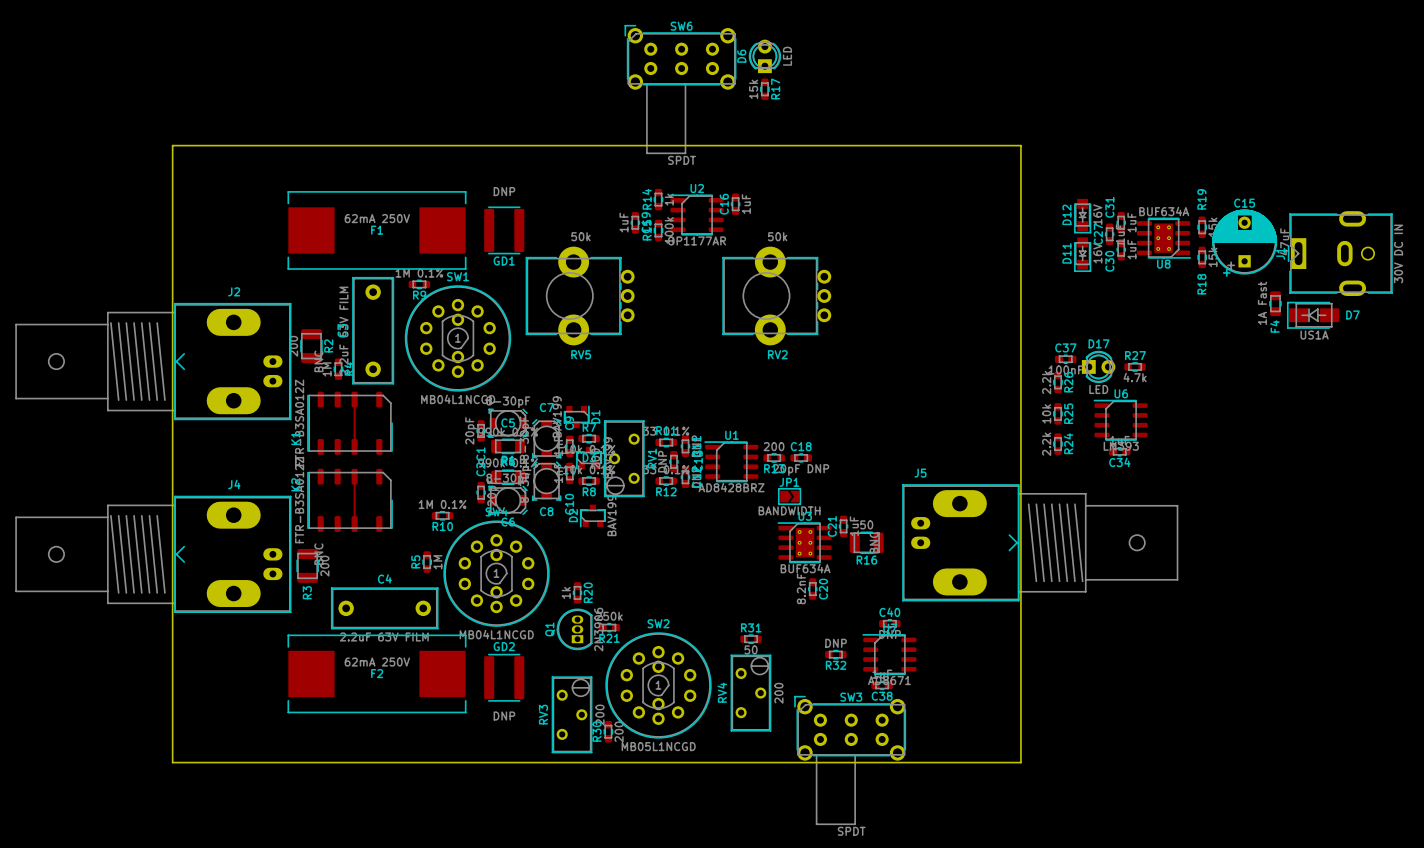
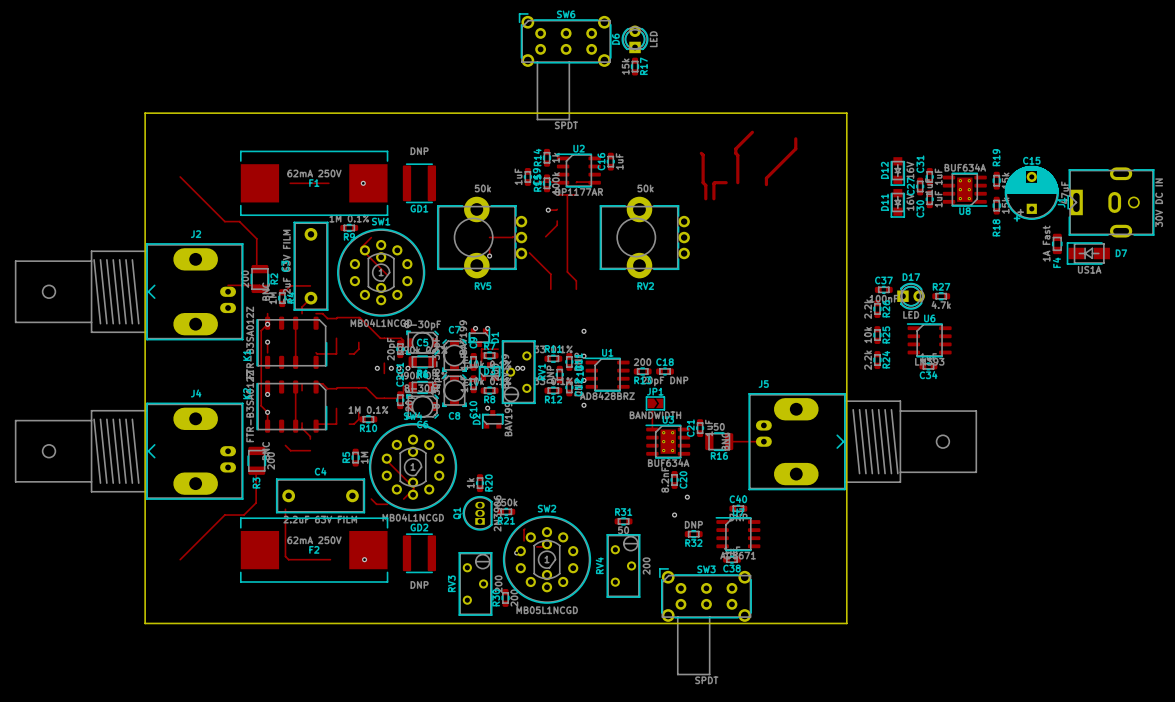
track: none -> (752, 132) (735, 148) (737, 155) (737, 182)
track: none -> (795, 138) (795, 148) (766, 178) (766, 184)
track: none -> (701, 153) (703, 155) (703, 182) (705, 185) (705, 198)
track: none -> (180, 176) (224, 221) (239, 221) (256, 238) (256, 265)
track: none -> (538, 182) (557, 182)
track: none -> (596, 182) (576, 182)
track: none -> (726, 182) (713, 183) (713, 198)
track: none -> (290, 183) (328, 183)
via: none -> (363, 183)
track: none -> (558, 194) (576, 194)
track: none -> (567, 194) (567, 271) (576, 280) (576, 289)
track: none -> (557, 209) (548, 210)
via: none -> (548, 210)
track: none -> (557, 221) (557, 225) (545, 236)
track: none -> (513, 236) (489, 237)
track: none -> (371, 237) (361, 247) (361, 251) (363, 251) (387, 275)
track: none -> (489, 249) (489, 256)
track: none -> (529, 252) (550, 274) (550, 289)
via: none -> (489, 256)
track: none -> (228, 285) (259, 285)
track: none -> (310, 285) (290, 285) (285, 291)
track: none -> (310, 297) (302, 307) (302, 313)
track: none -> (267, 313) (267, 324) (261, 330) (261, 405) (267, 412) (267, 422)
track: none -> (316, 313) (322, 313) (327, 318) (359, 317) (380, 338) (401, 338) (403, 340) (403, 351)
via: none -> (267, 324)
via: none -> (475, 328)
via: none -> (487, 328)
via: none -> (583, 331)
track: none -> (336, 338) (336, 353) (316, 352)
track: none -> (267, 342) (267, 352)
via: none -> (267, 342)
track: none -> (358, 342) (358, 349) (354, 353) (349, 353)
track: none -> (498, 349) (481, 349) (481, 361)
via: none -> (583, 356)
track: none -> (384, 363) (384, 373)
via: none -> (377, 368)
via: none -> (391, 368)
via: none -> (399, 368)
via: none -> (407, 368)
via: none -> (517, 368)
via: none -> (522, 368)
via: none -> (583, 380)
track: none -> (302, 383) (302, 390)
track: none -> (316, 383) (322, 383) (327, 388) (366, 387) (376, 398) (401, 398) (403, 395) (403, 385)
via: none -> (267, 394)
via: none -> (583, 405)
track: none -> (336, 408) (336, 424) (316, 422)
via: none -> (487, 408)
track: none -> (652, 411) (652, 429)
via: none -> (267, 412)
track: none -> (358, 412) (358, 419) (354, 424) (349, 424)
track: none -> (302, 422) (302, 428) (310, 436) (310, 439)
track: none -> (729, 441) (763, 441)
track: none -> (285, 445) (290, 450) (310, 450)
track: none -> (387, 461) (411, 485) (413, 485) (413, 489) (403, 499)
track: none -> (256, 470) (256, 502) (244, 515) (224, 515) (180, 559)
via: none -> (687, 497)
track: none -> (371, 499) (376, 504) (387, 504)
track: none -> (285, 509) (285, 556) (288, 559) (330, 559)
via: none -> (674, 515)
track: none -> (524, 529) (524, 540)
track: none -> (536, 546) (549, 547)
via: none -> (516, 552)
via: none -> (364, 559)

